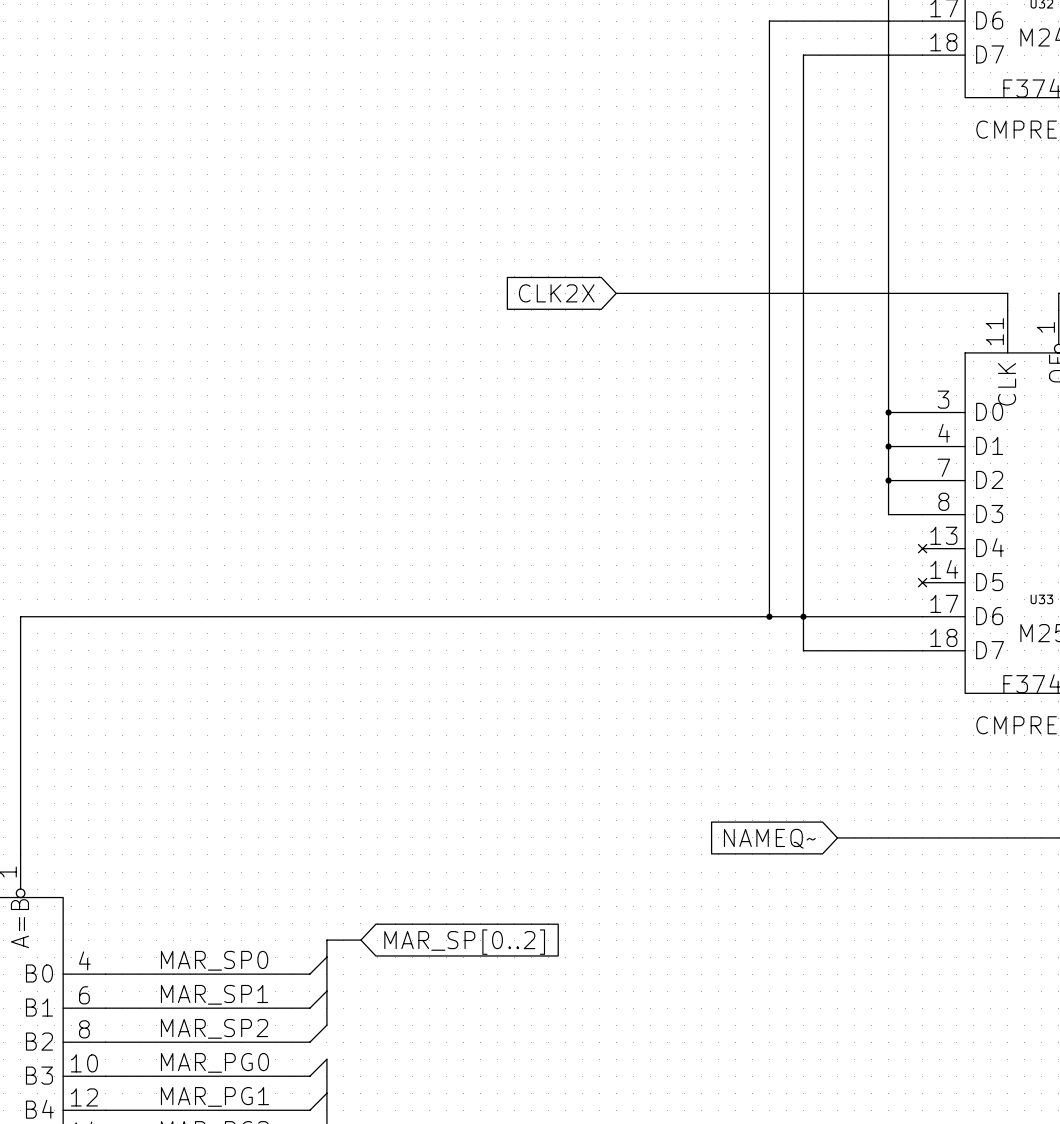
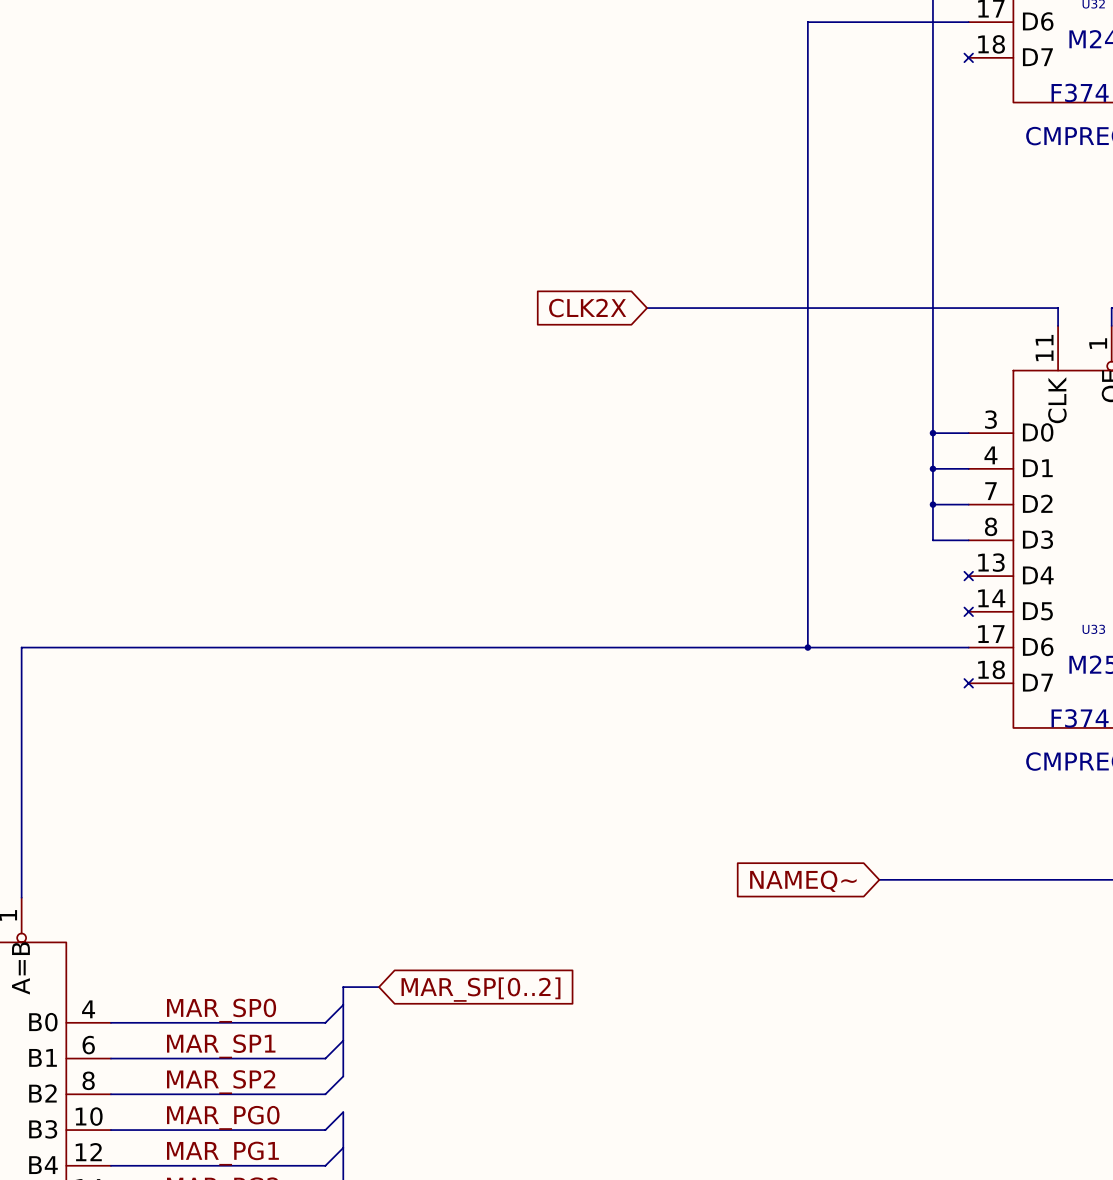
wire: (922, 55) (803, 55) (803, 650) (922, 650) -> none
no-connect mark: none -> (968, 57)
junction: (803, 616) -> none
no-connect mark: none -> (968, 683)

